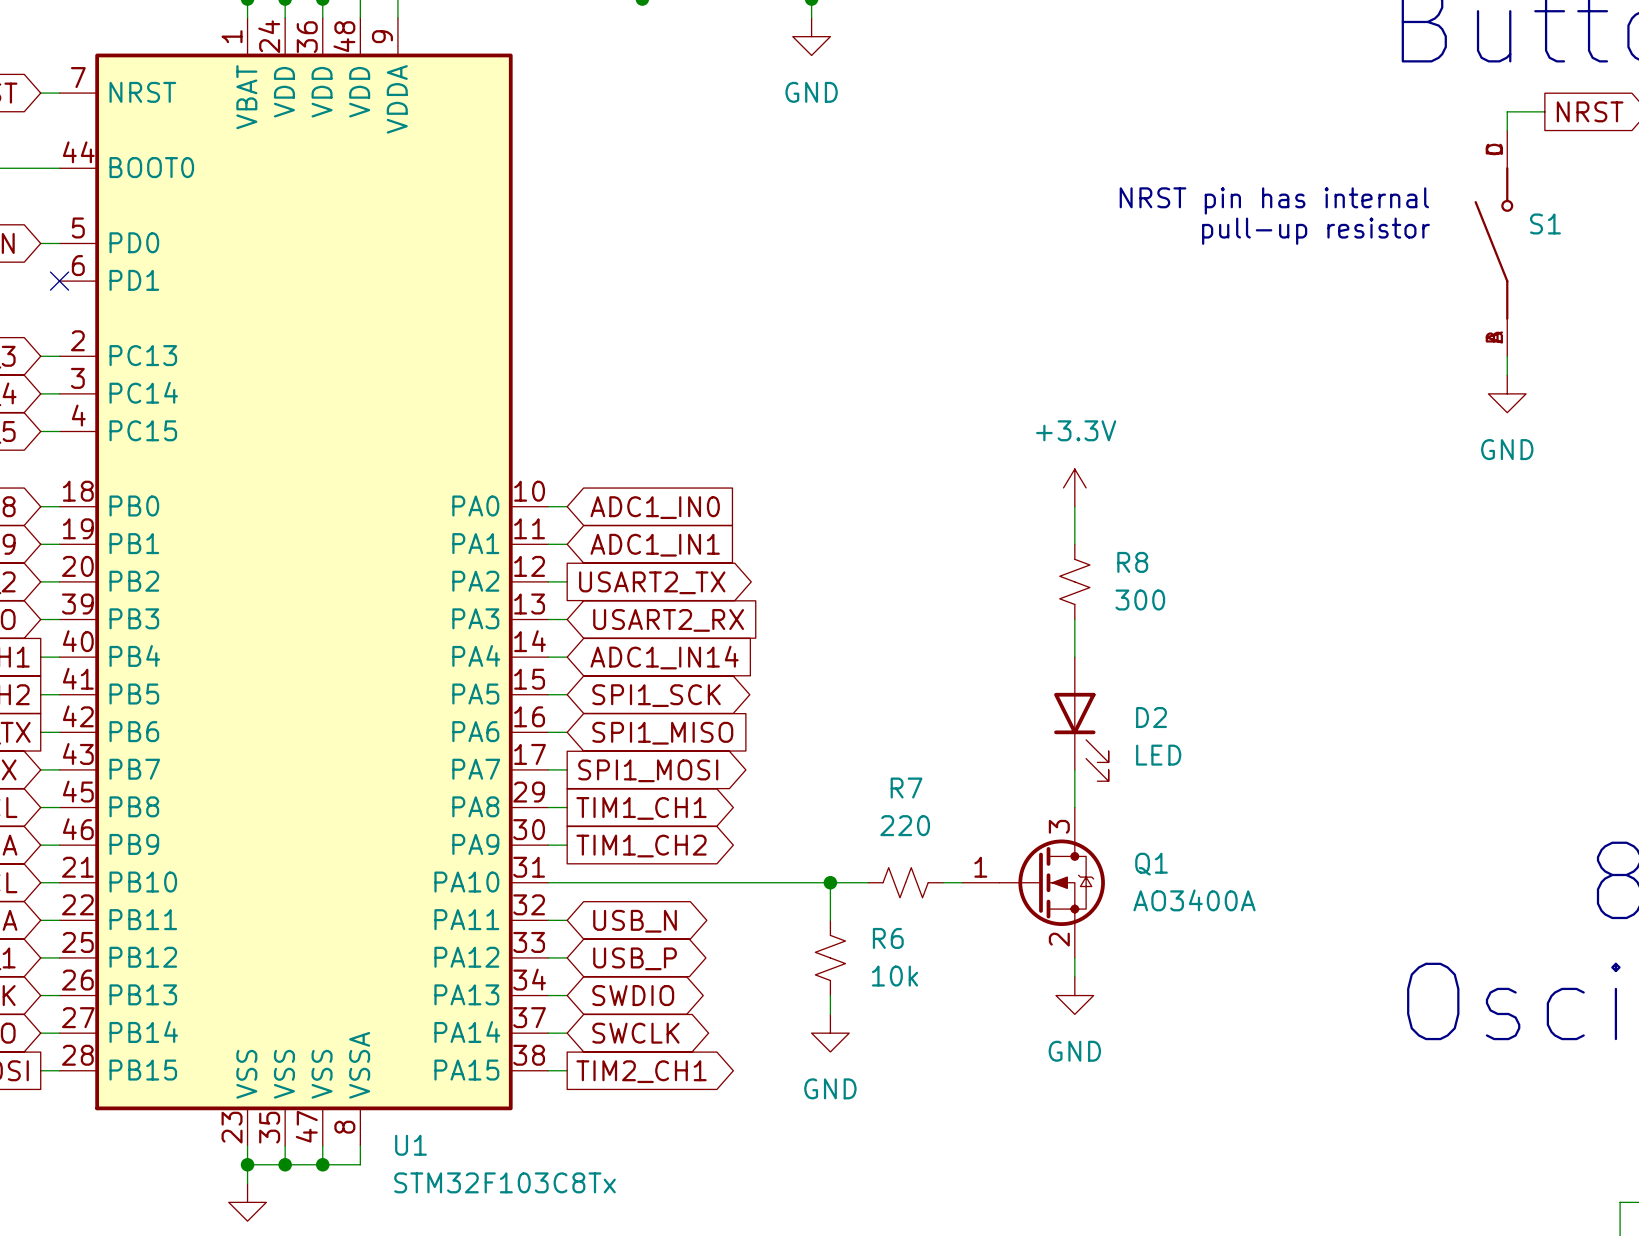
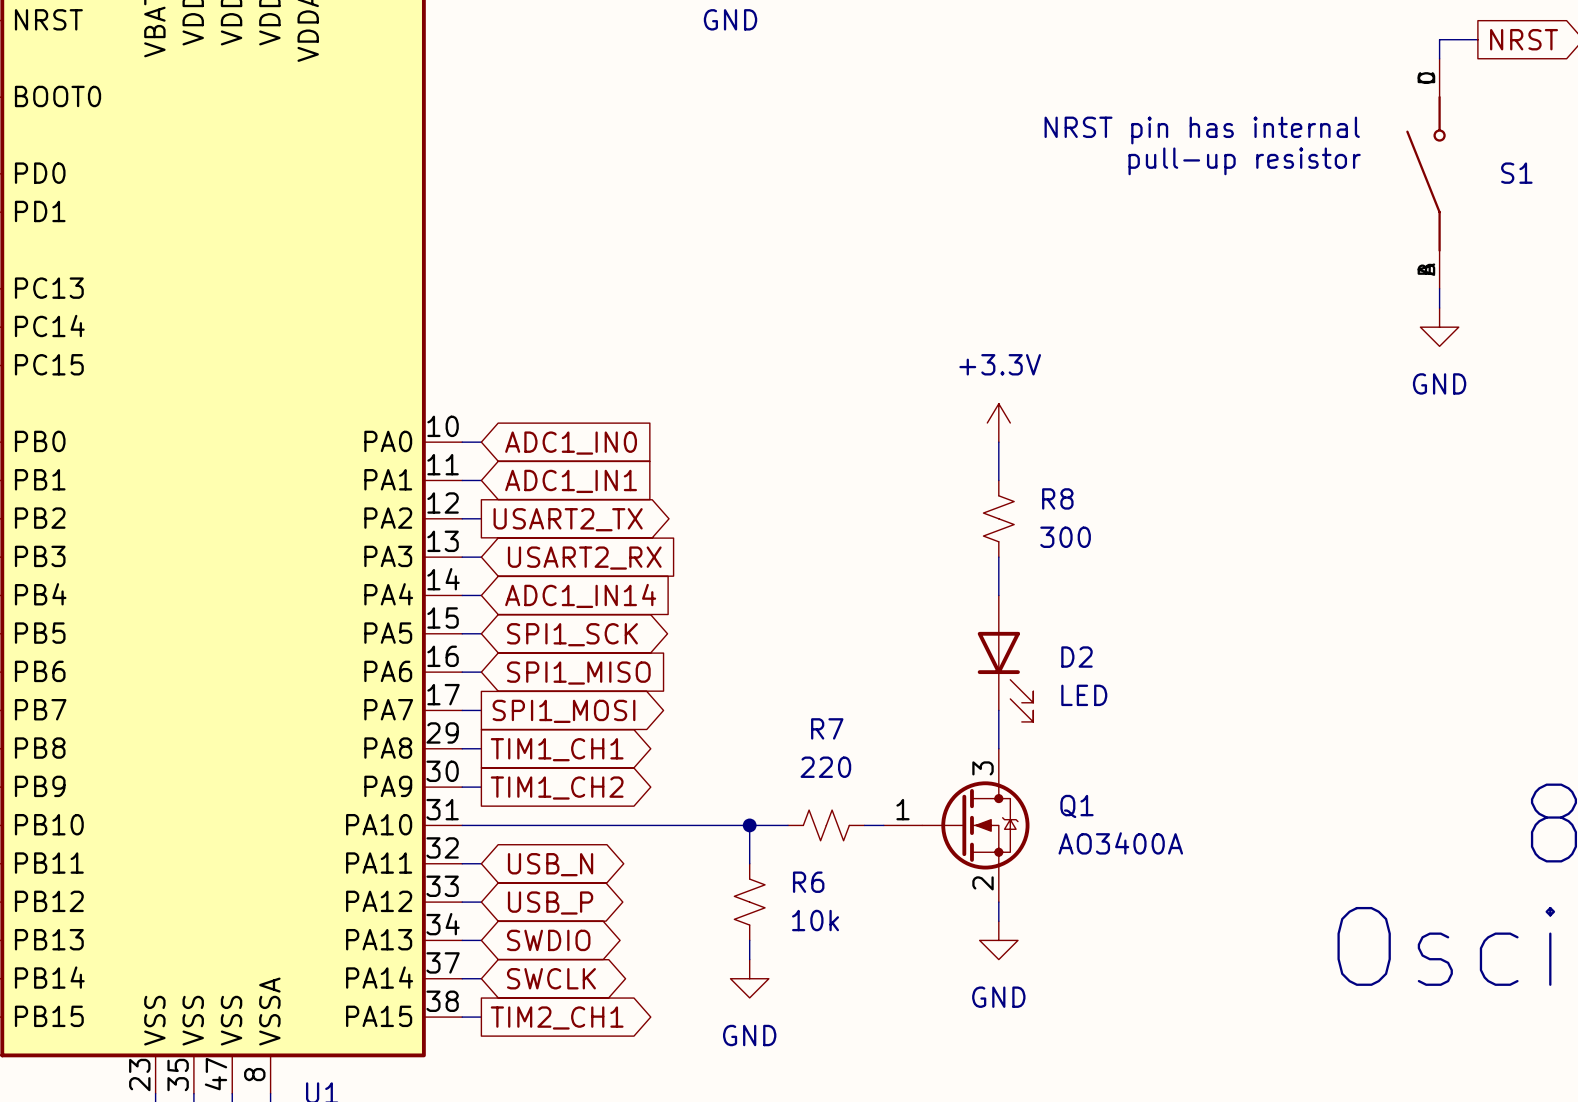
S1 name position: S1 (1545, 223) -> S1 (1516, 173)

